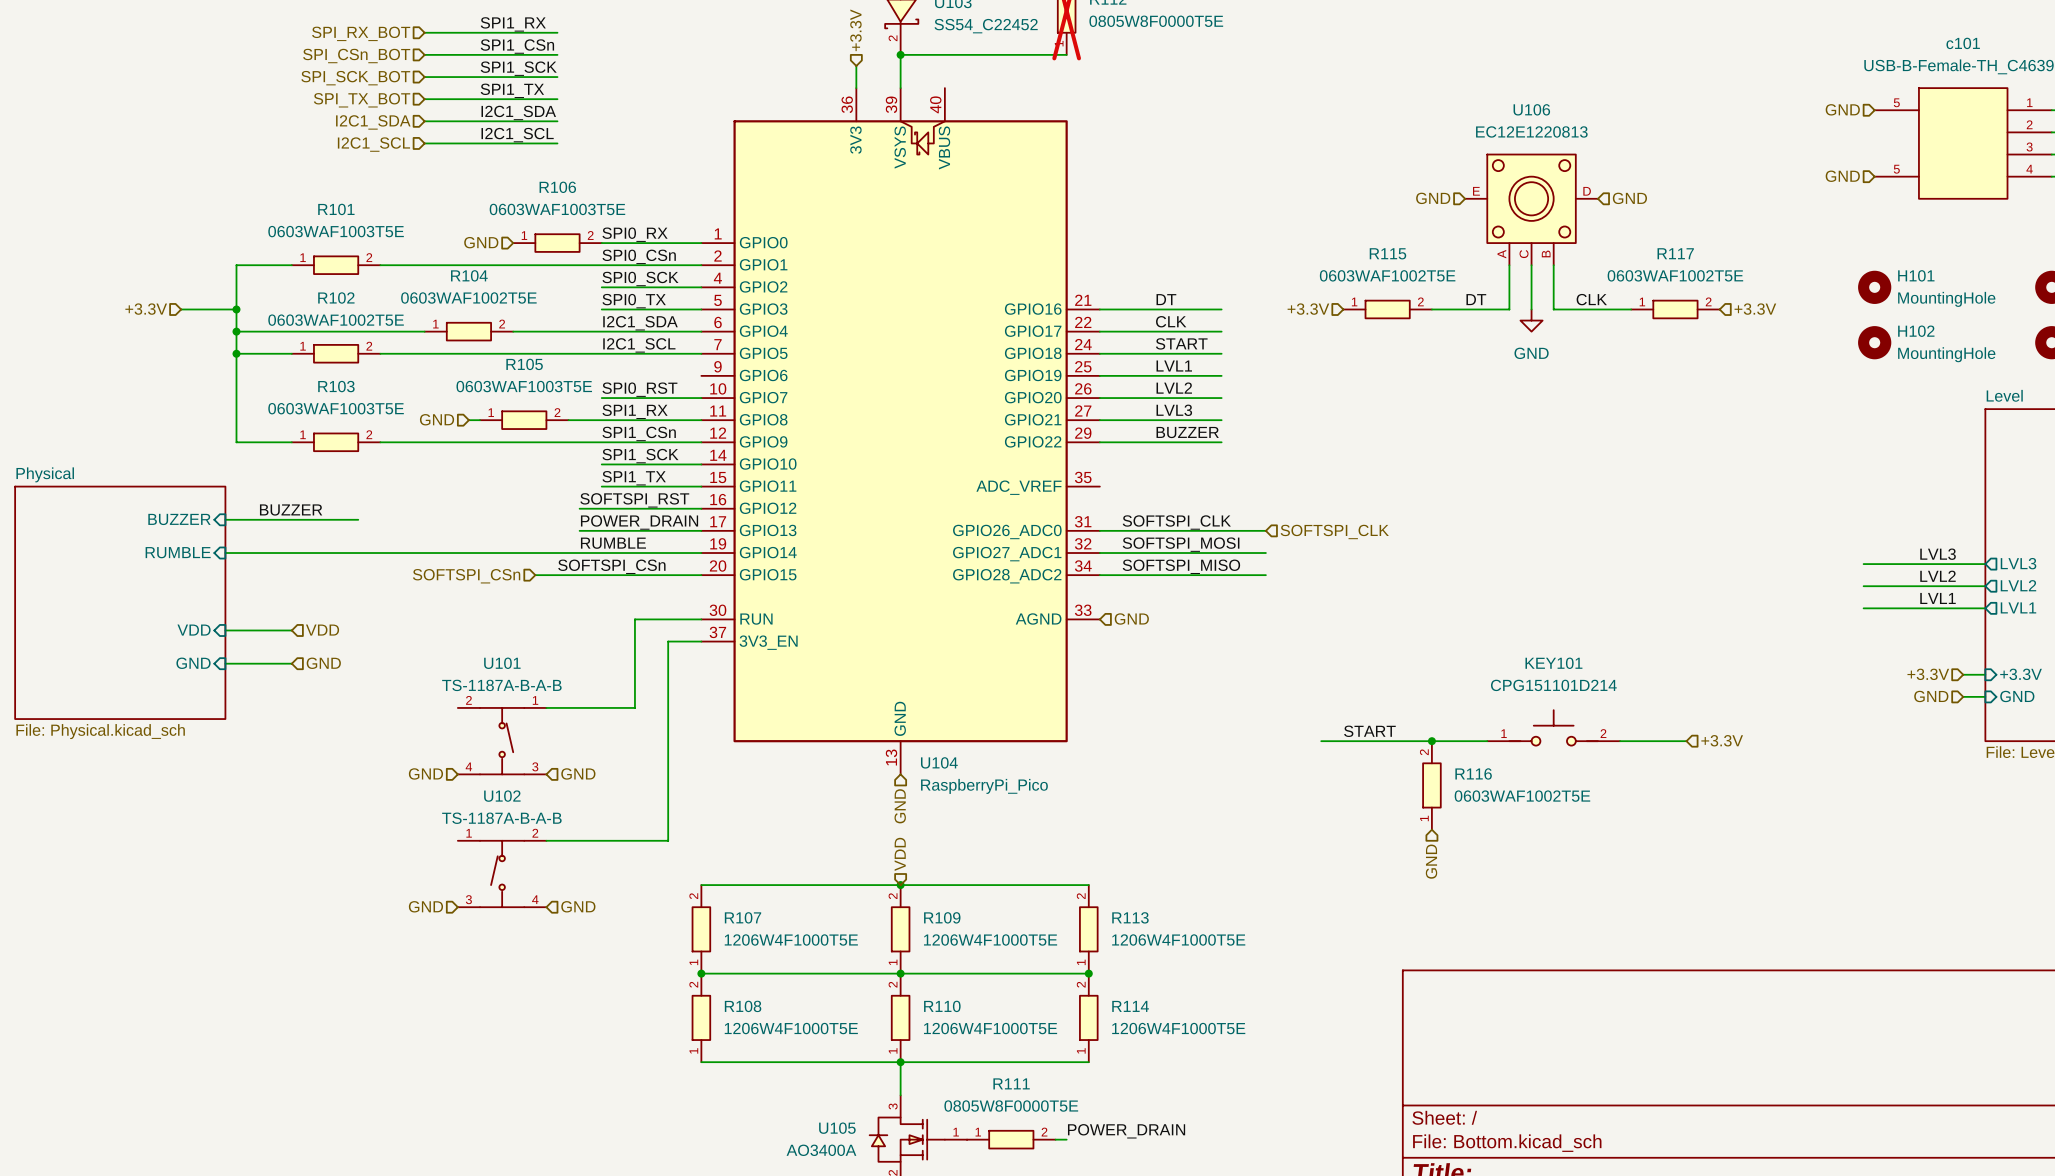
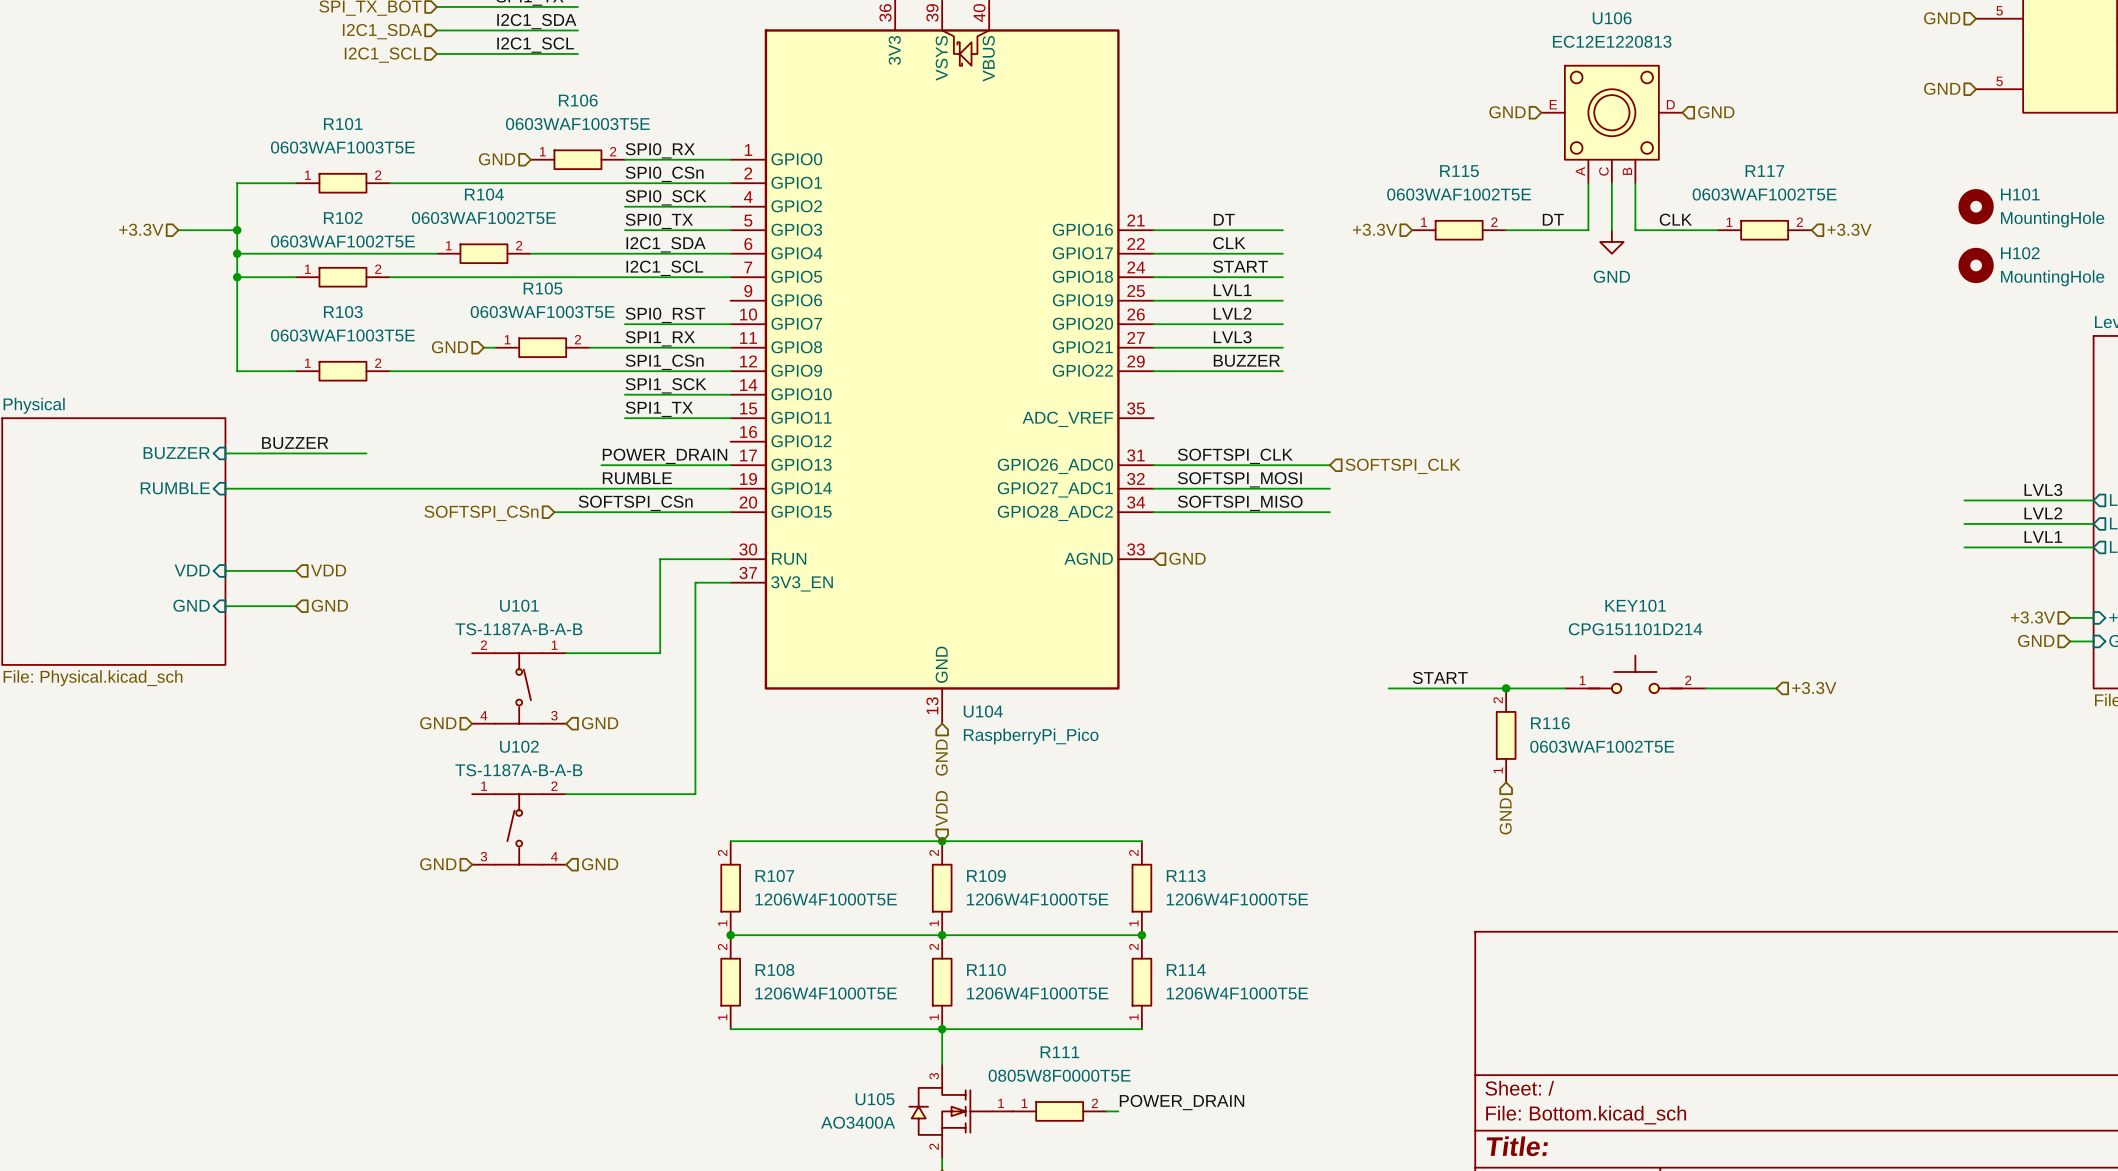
label: SOFTSPI_RST (634, 500) -> none
wire: (579, 508) (701, 508) -> none

